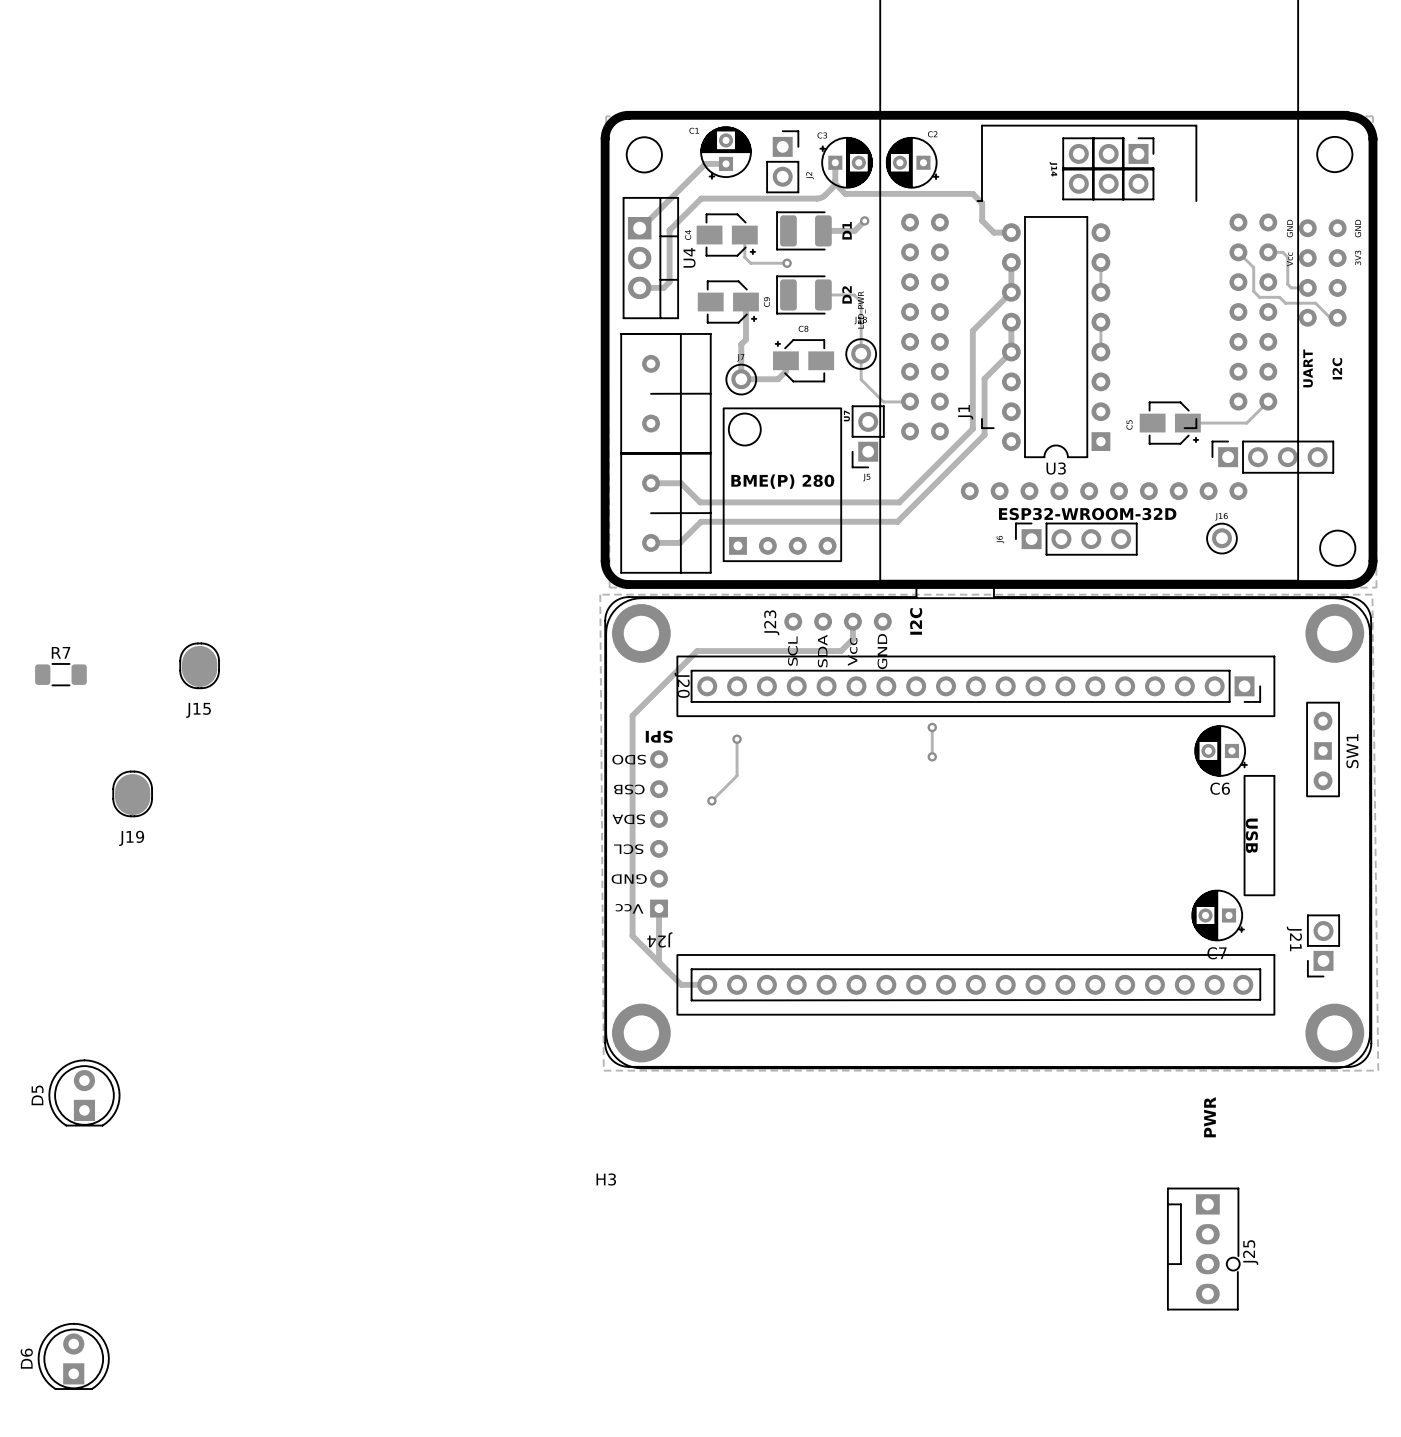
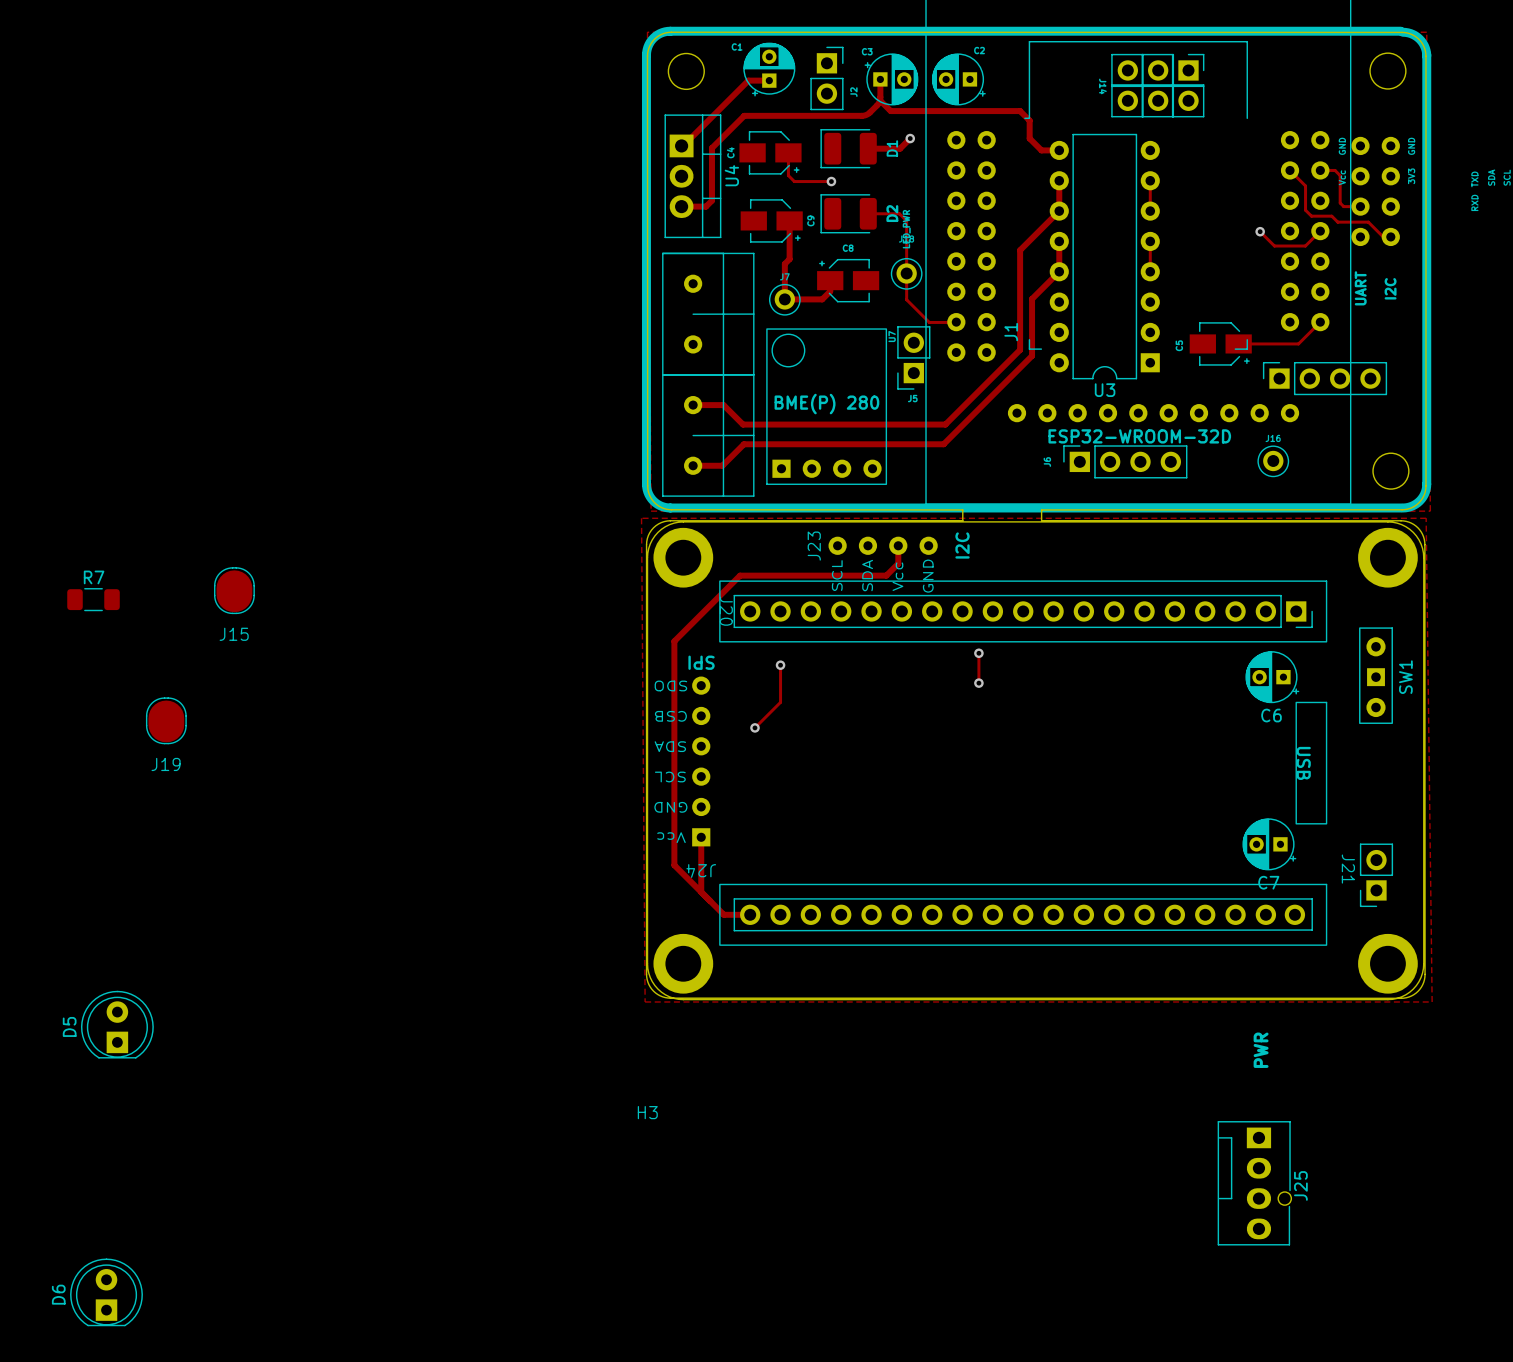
via: none -> (1260, 231)
track: none -> (1320, 231) (1305, 246) (1274, 246) (1260, 231)

